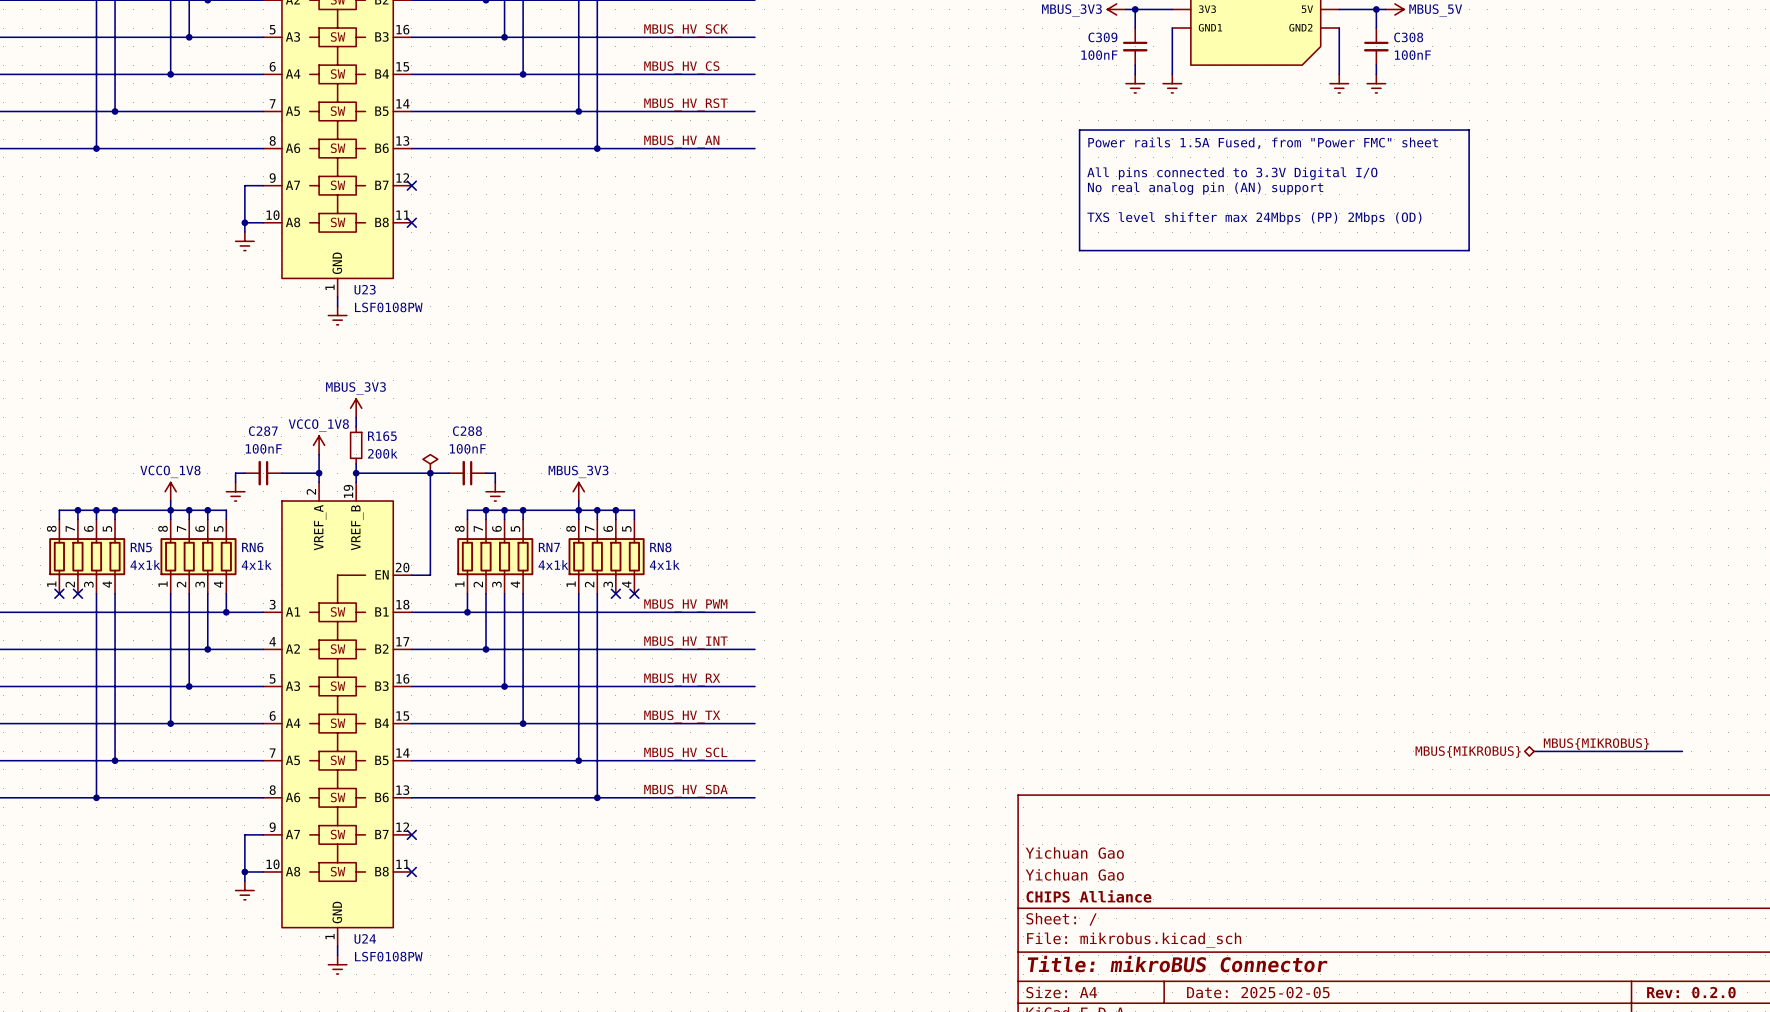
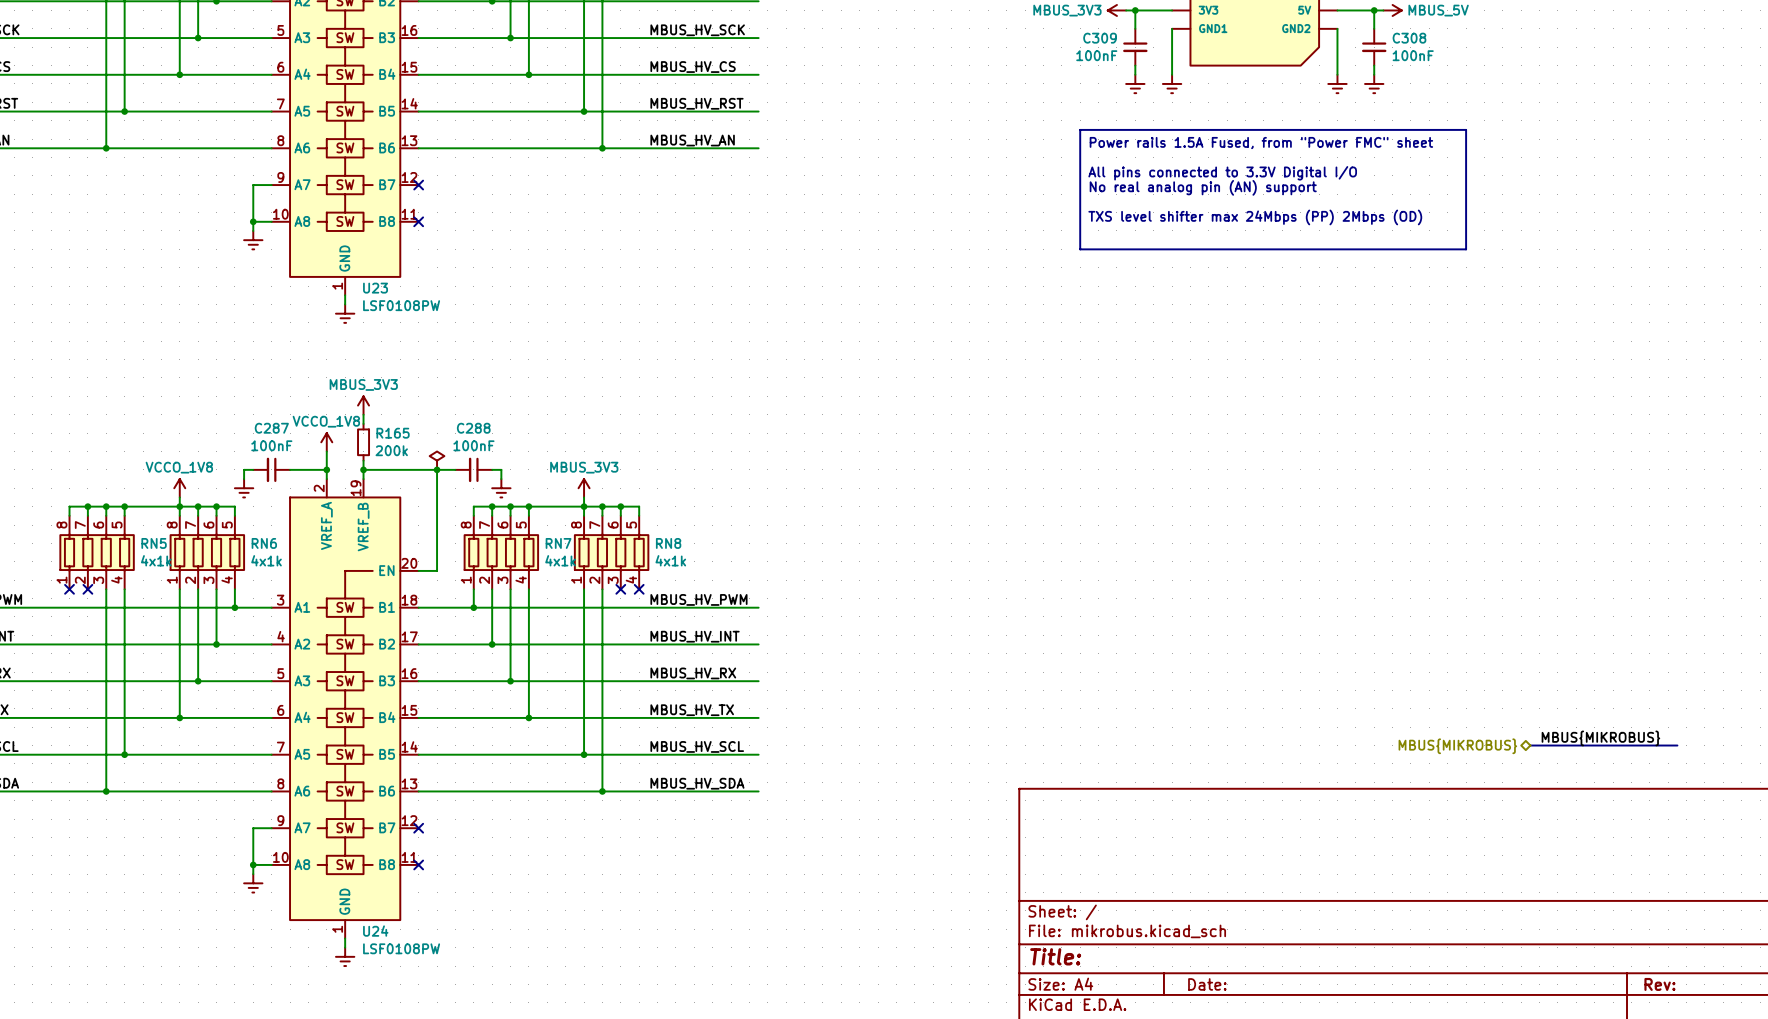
title block: Yichuan Gao (1074, 852) -> none
title block: Yichuan Gao (1074, 874) -> none
title block: CHIPS Alliance (1088, 896) -> none
title block: Title: mikroBUS Connector (1177, 964) -> Title: (1055, 956)
title block: Date: 2025-02-05 (1258, 992) -> Date: (1207, 984)
title block: Rev: 0.2.0 (1691, 992) -> Rev: (1659, 984)

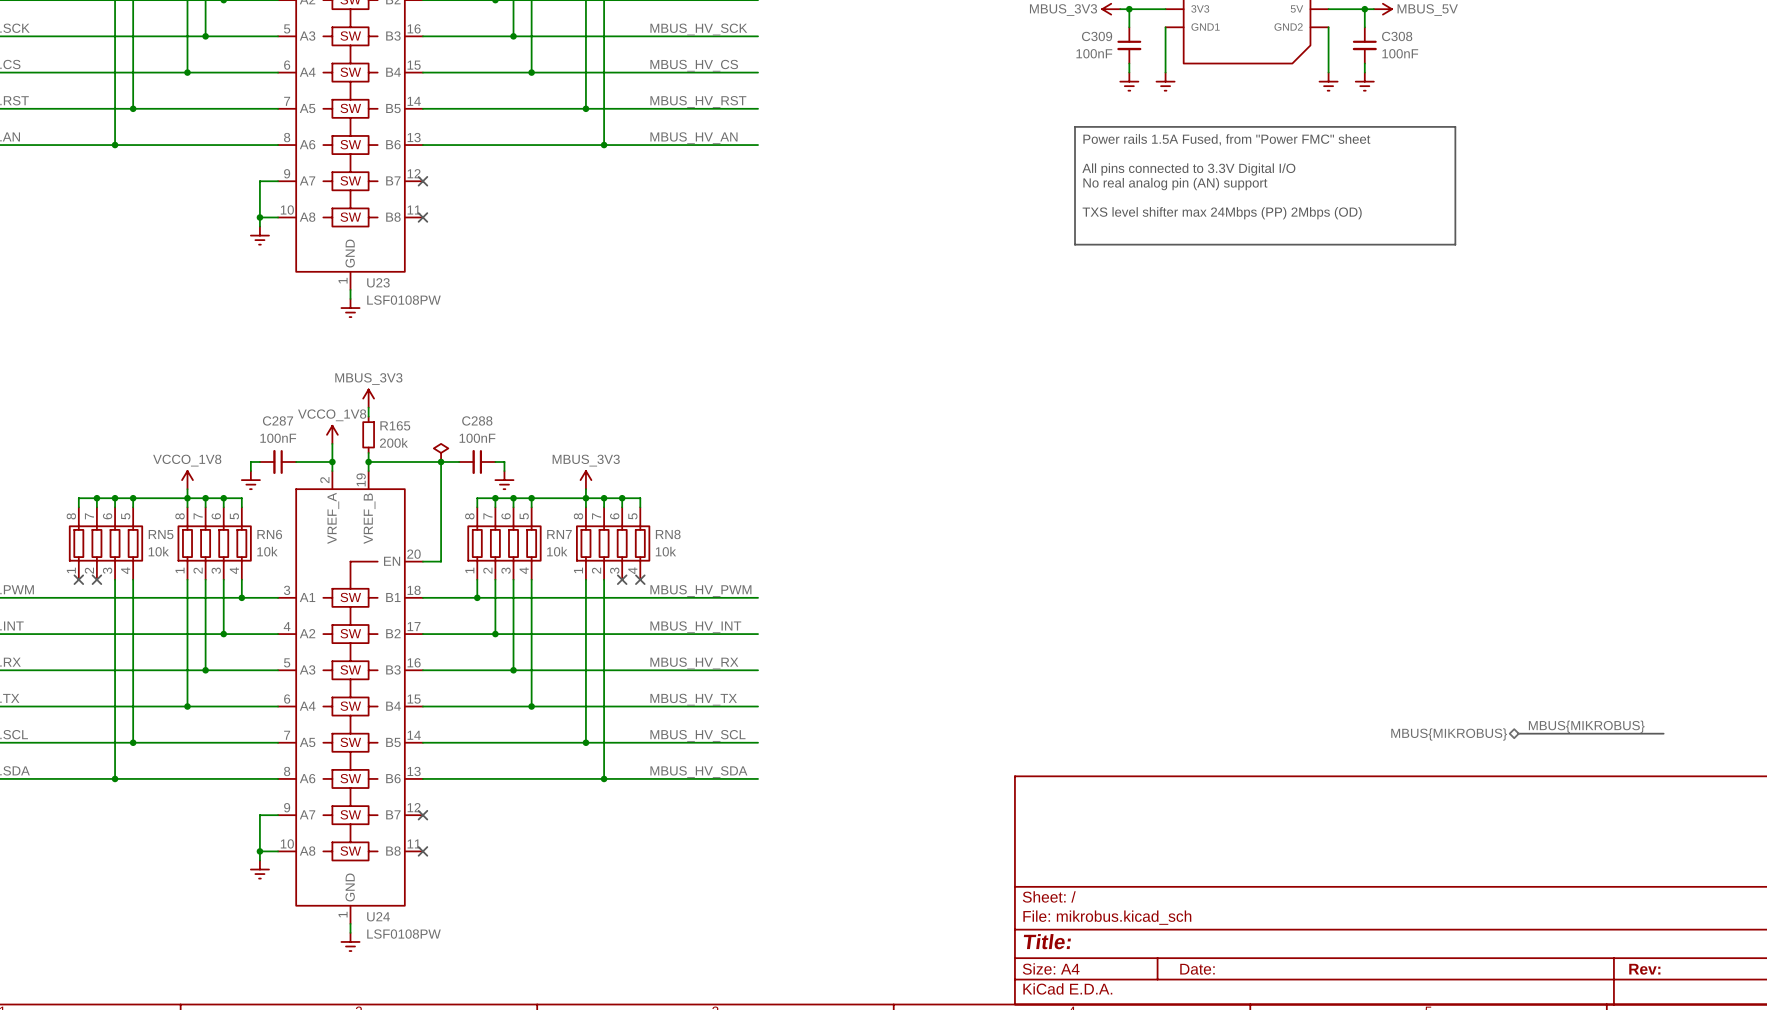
RN5 value: 4x1k (156, 560) -> 10k (158, 551)
RN6 value: 4x1k (266, 560) -> 10k (267, 551)
RN7 value: 4x1k (560, 560) -> 10k (557, 551)
RN8 value: 4x1k (670, 560) -> 10k (665, 551)

